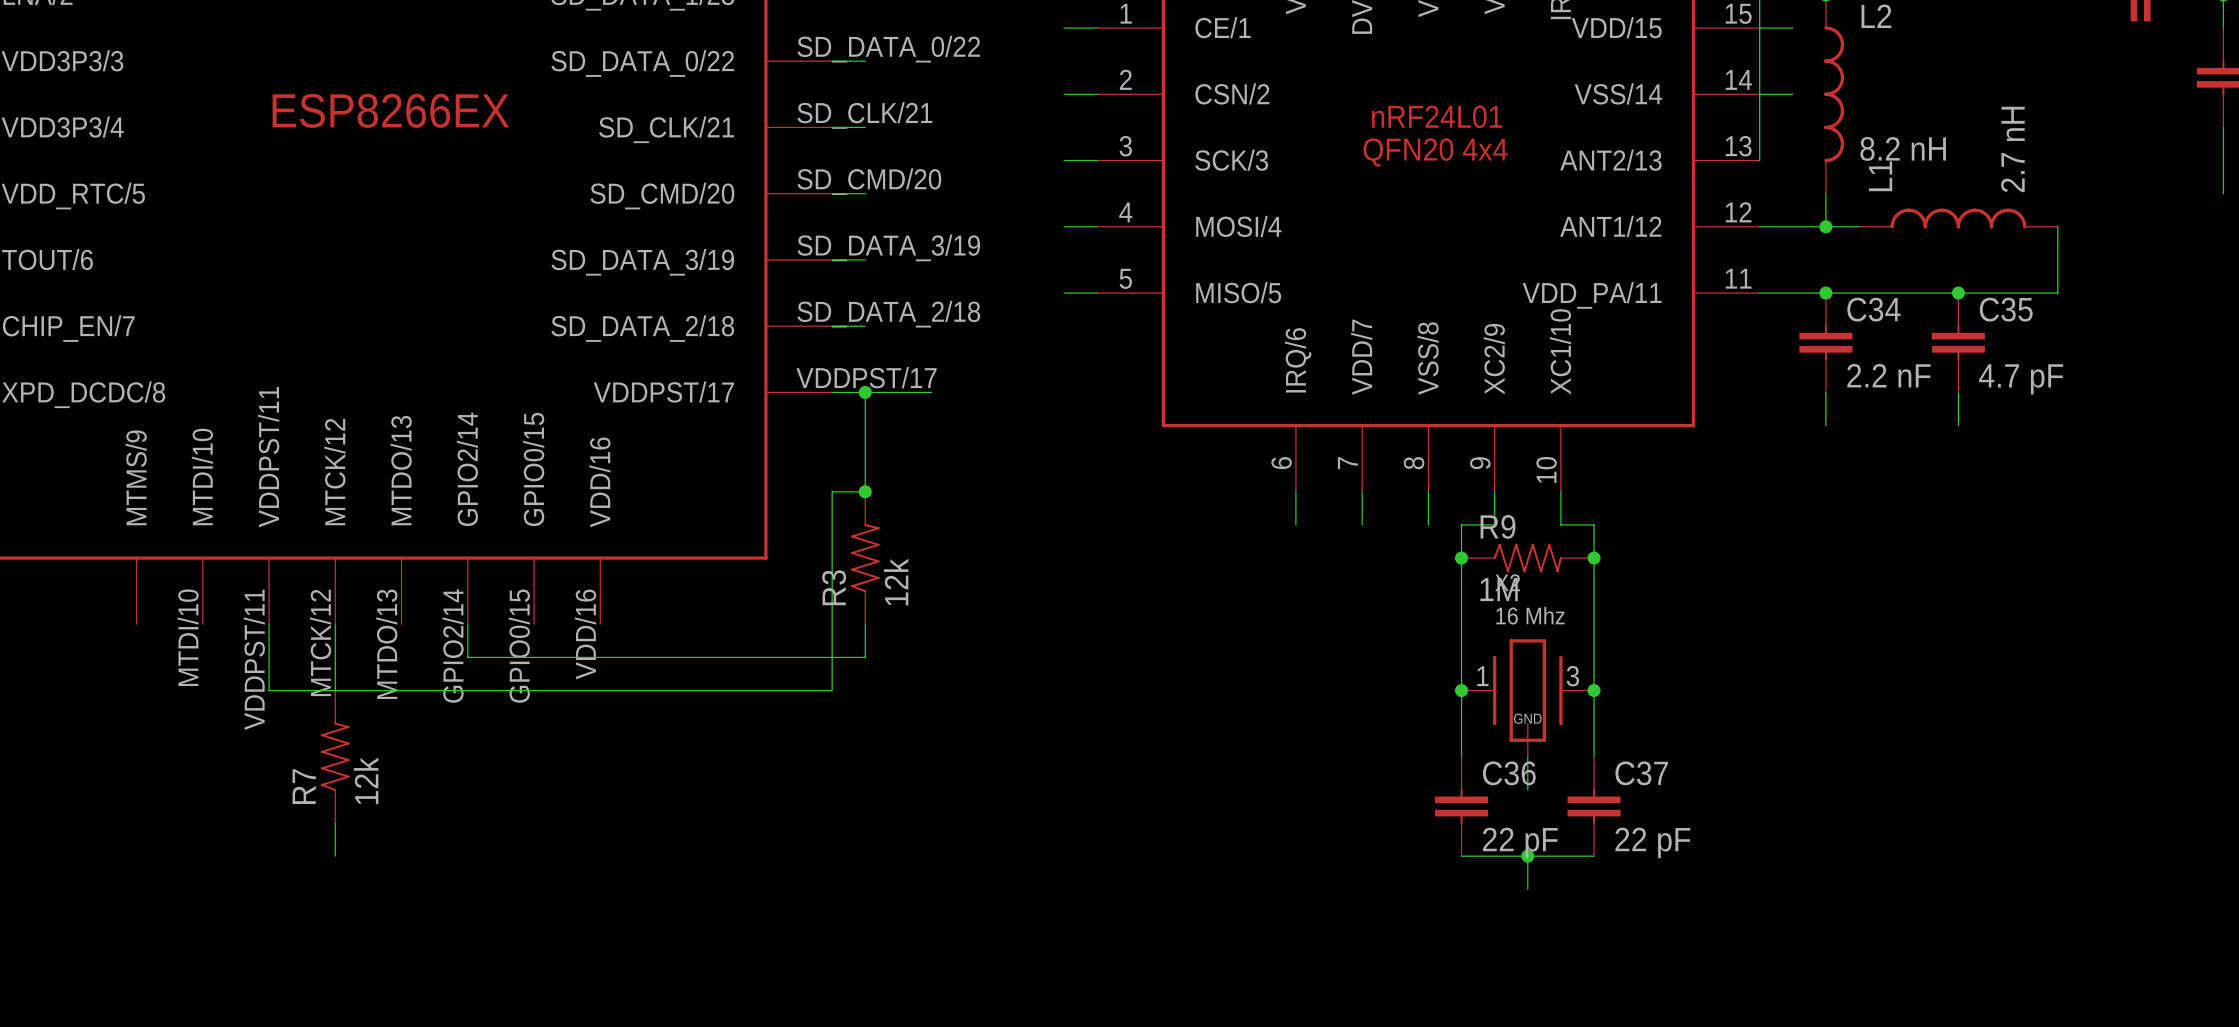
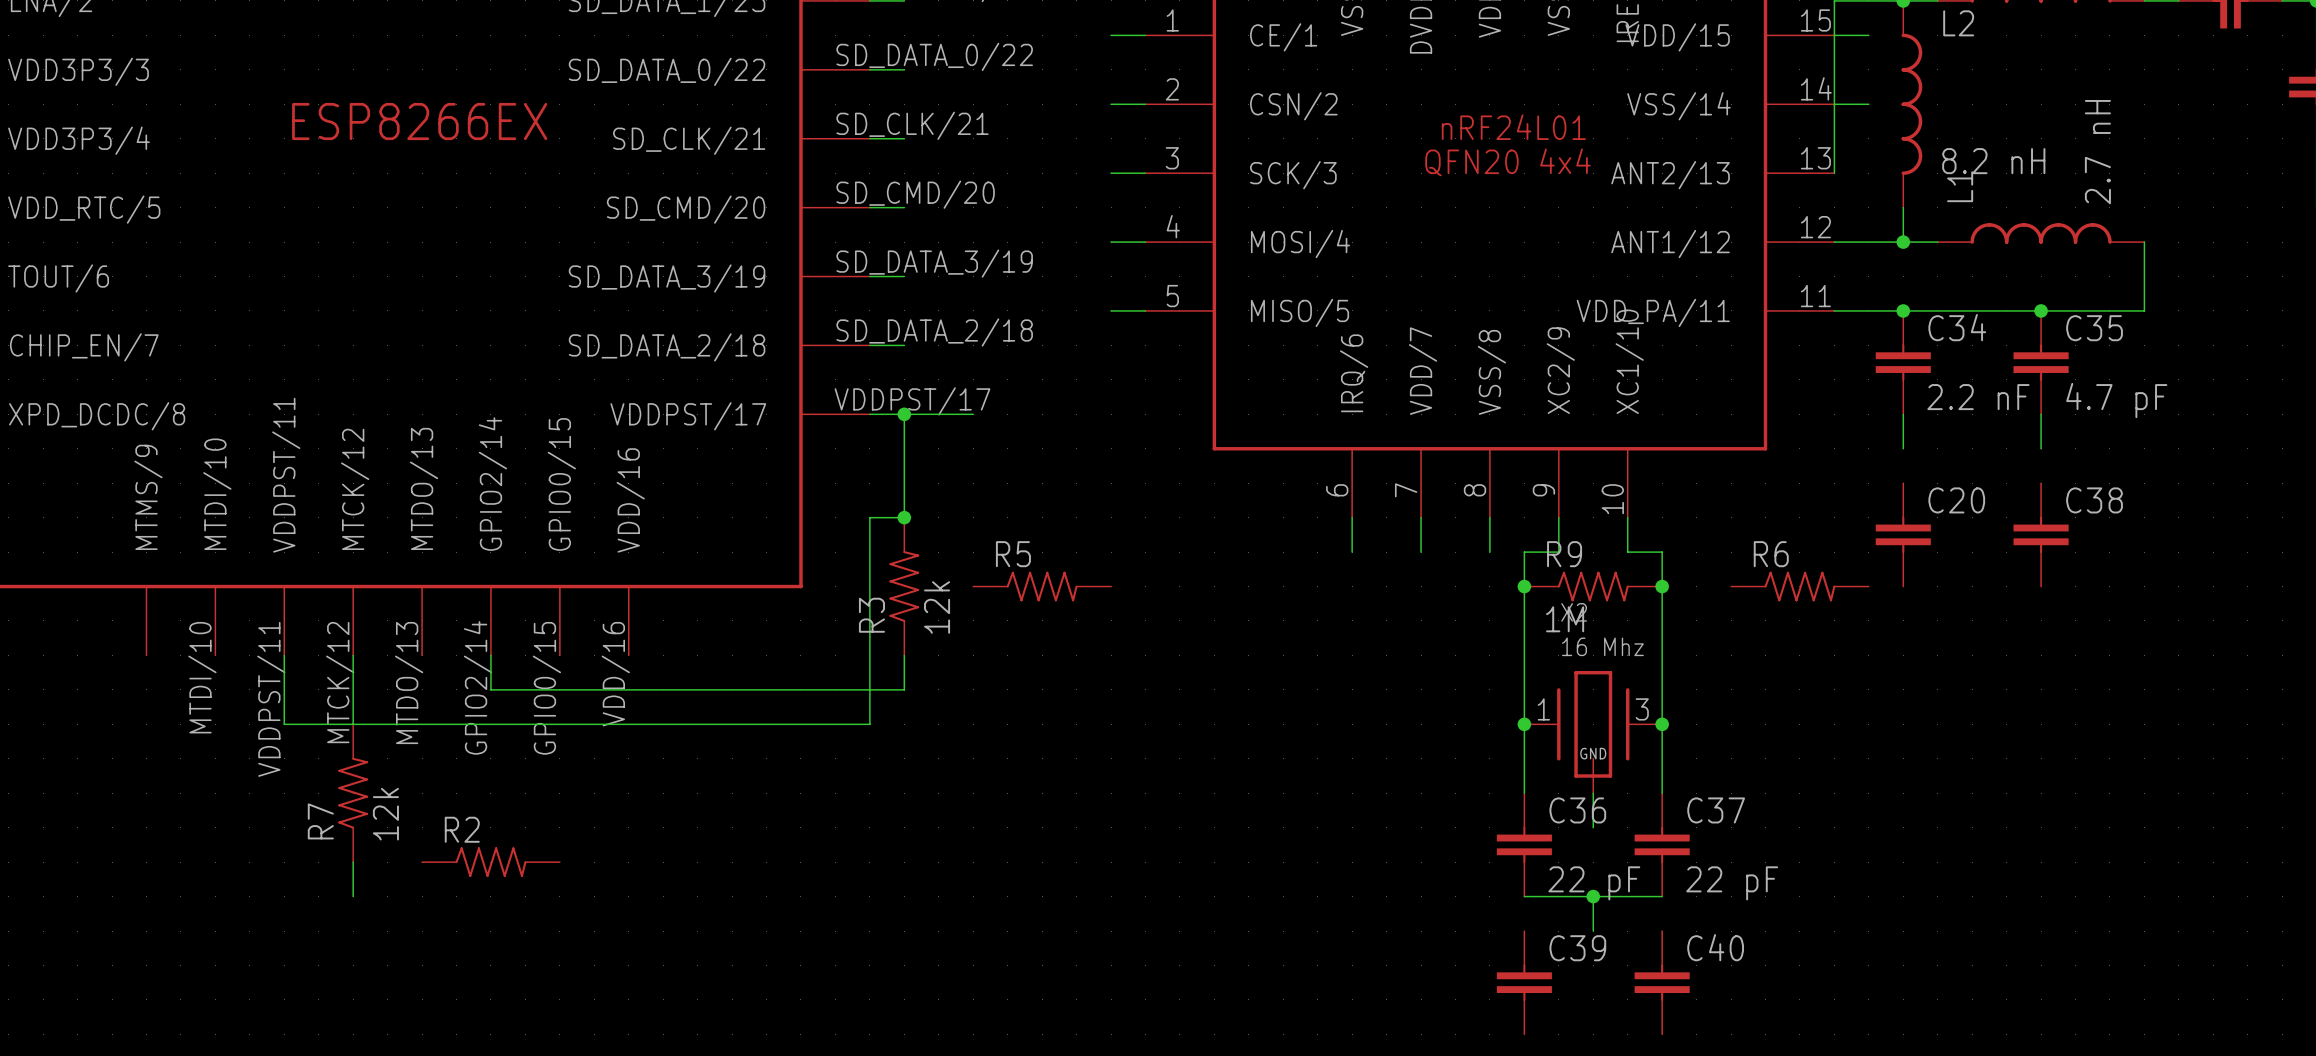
C20: none -> (1903, 534)
C38: none -> (2041, 534)
R5: none -> (1042, 586)
R6: none -> (1799, 586)
R2: none -> (490, 862)
C39: none -> (1524, 982)
C40: none -> (1662, 982)

